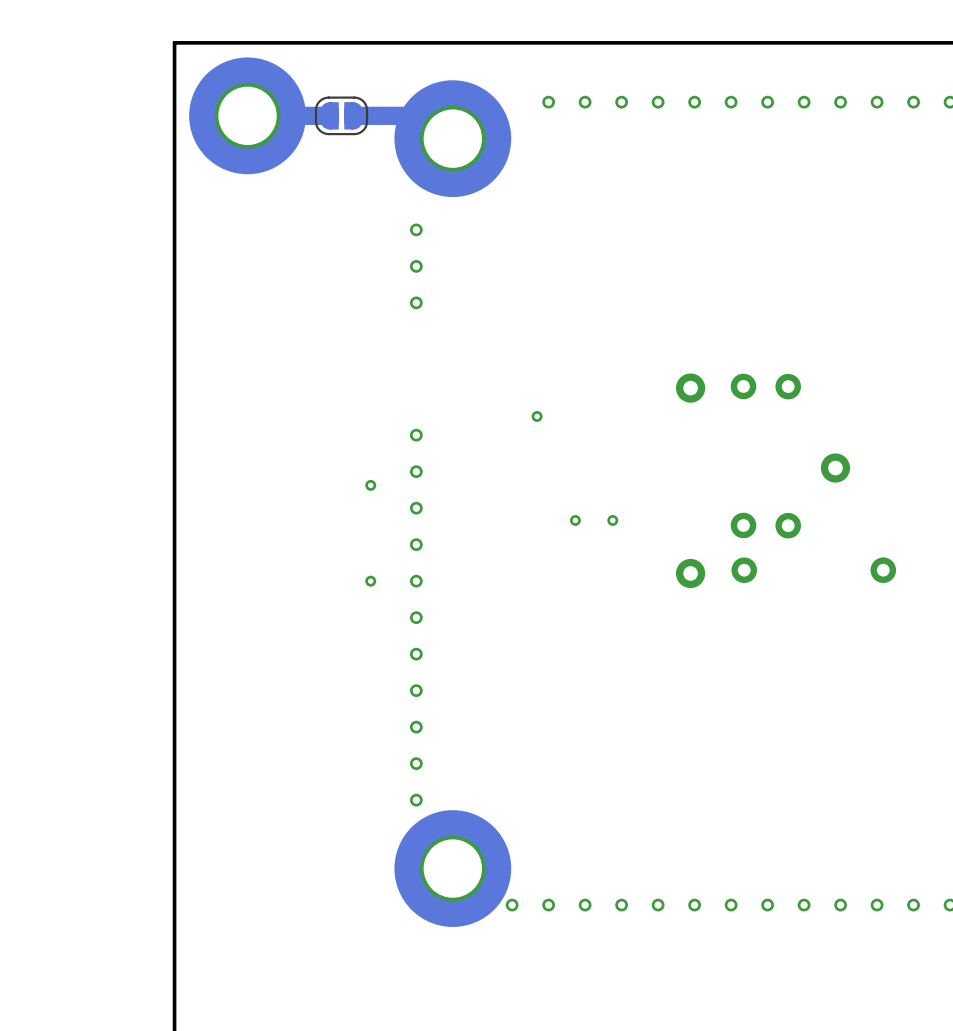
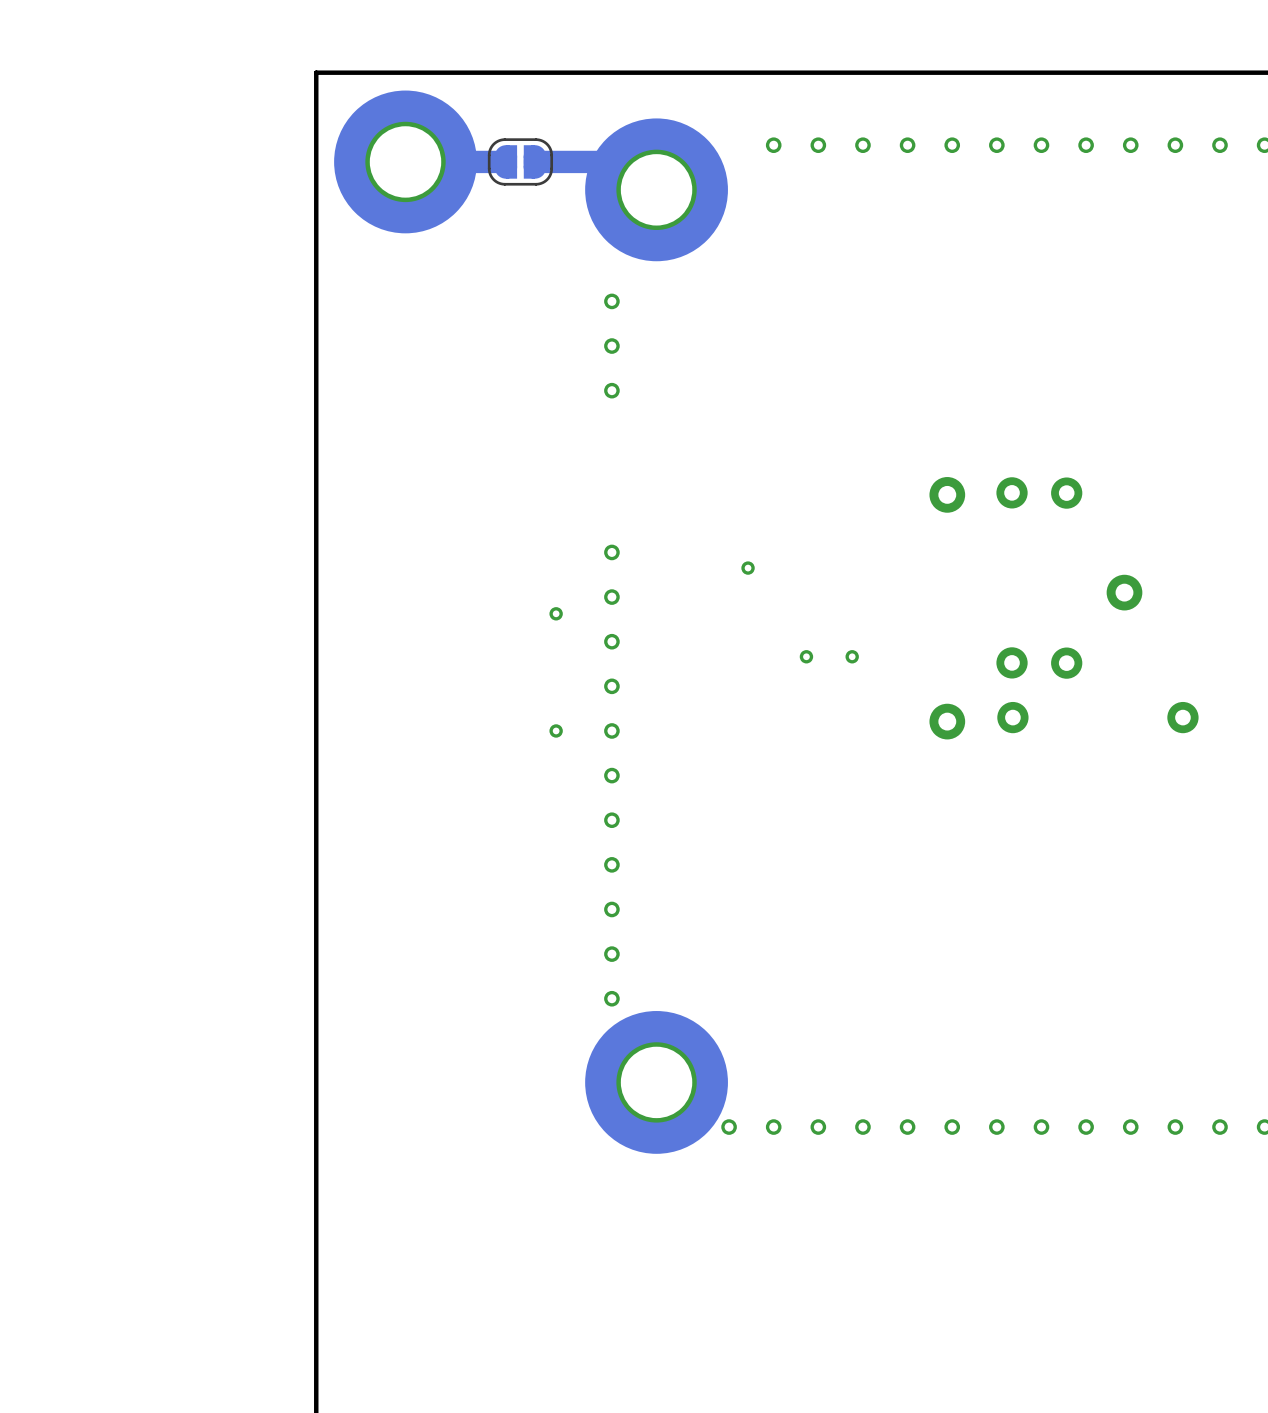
via position: (537, 416) -> (748, 568)

